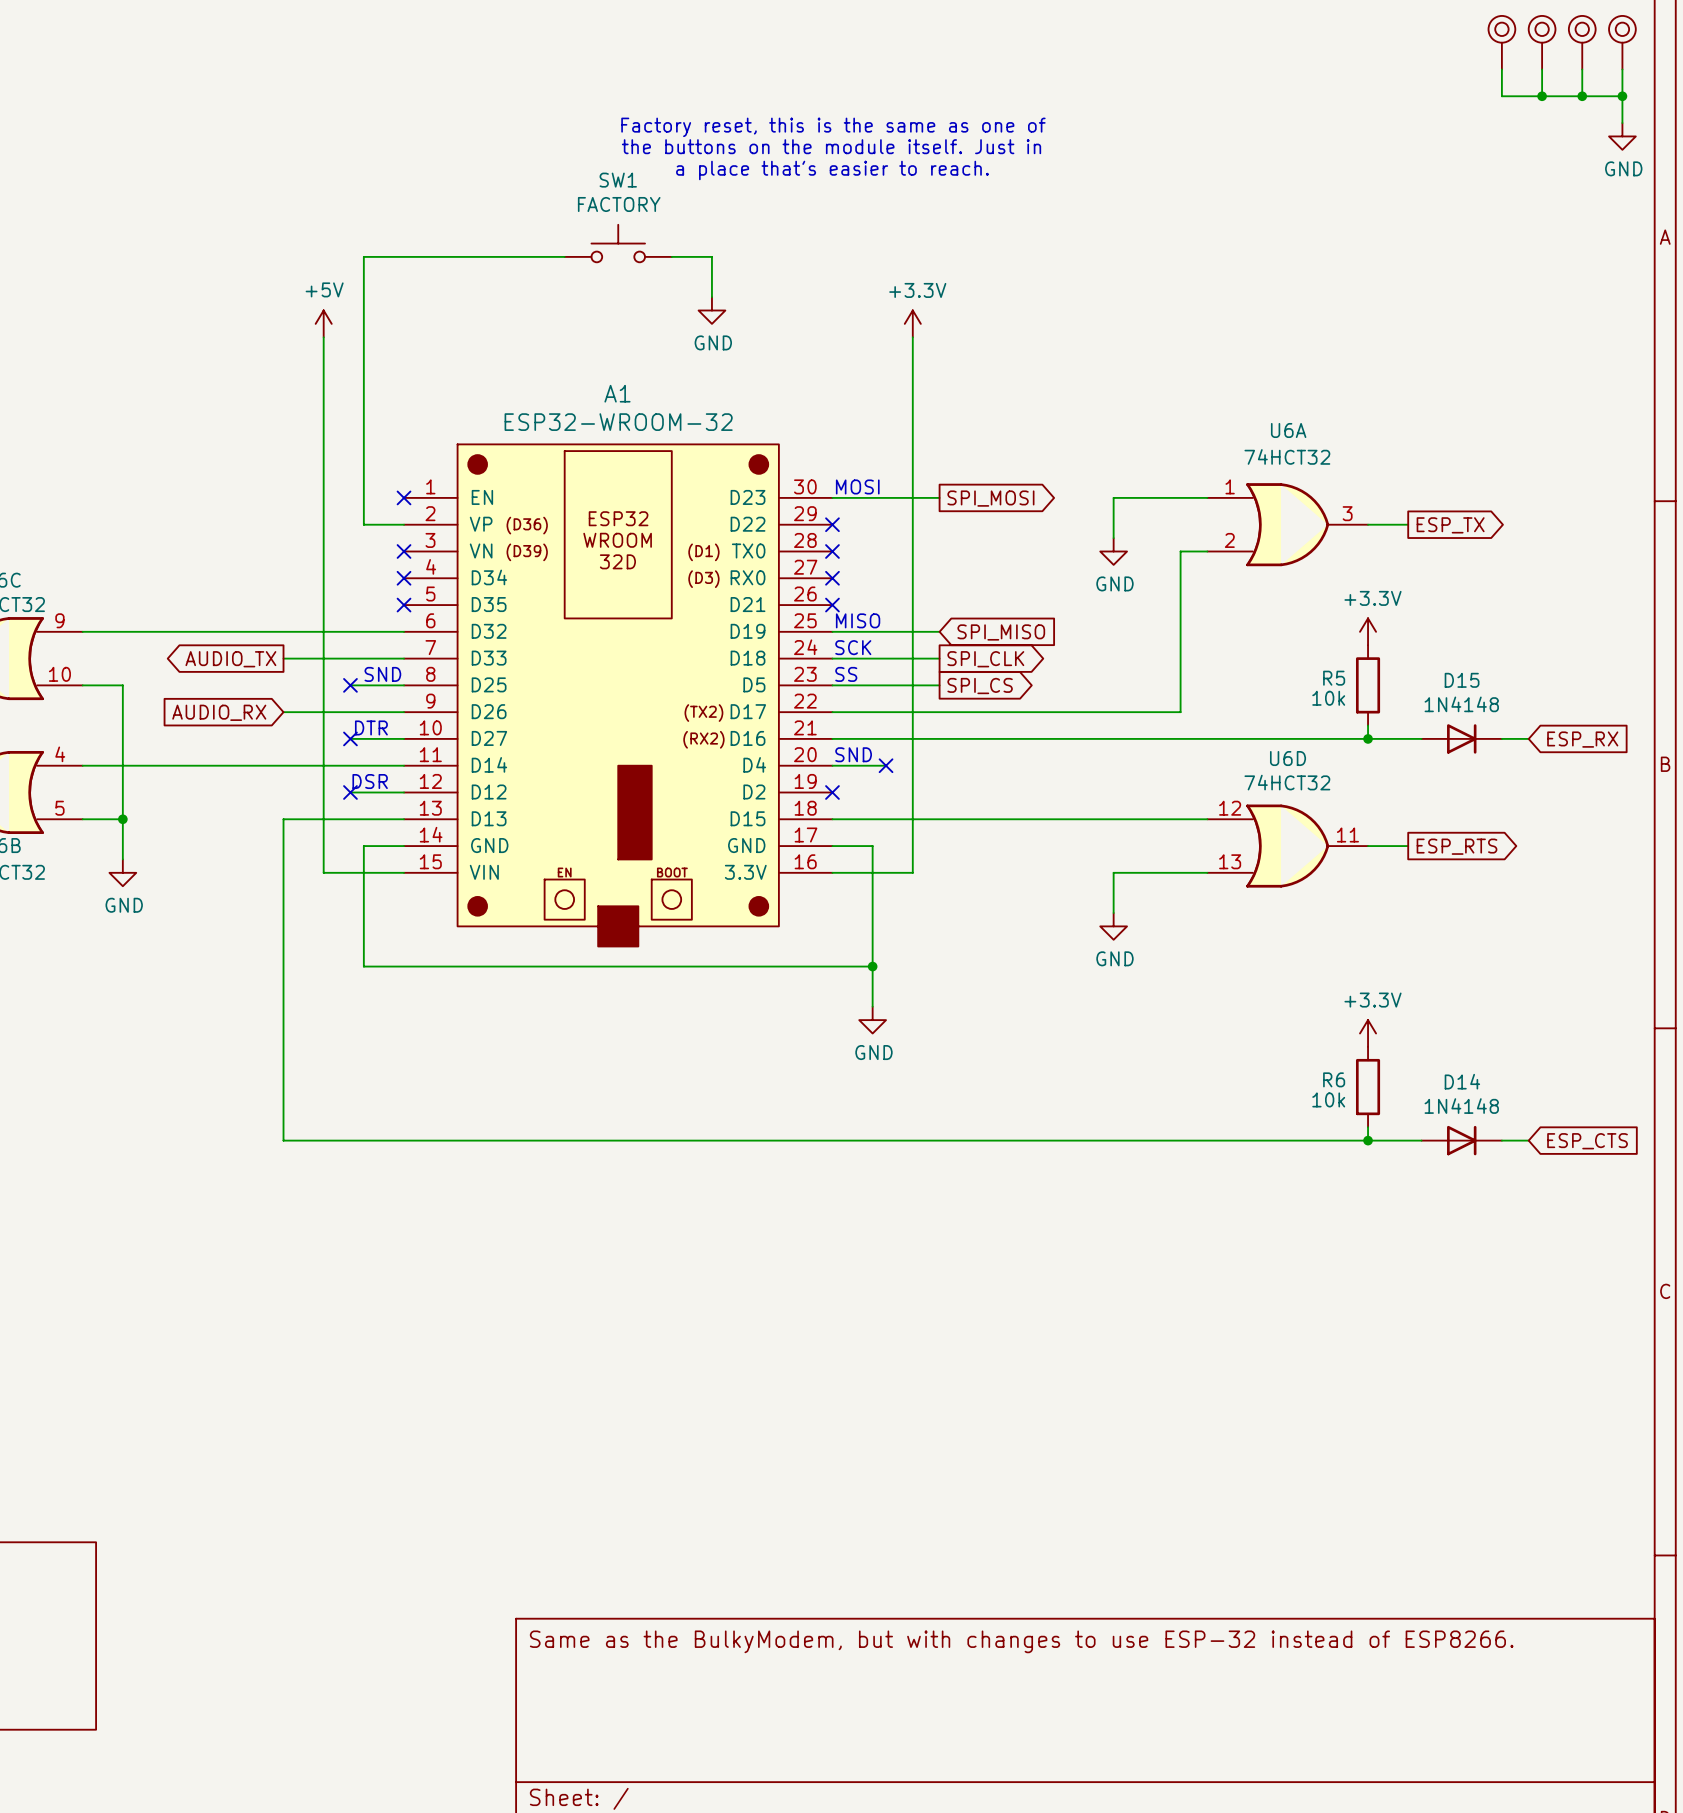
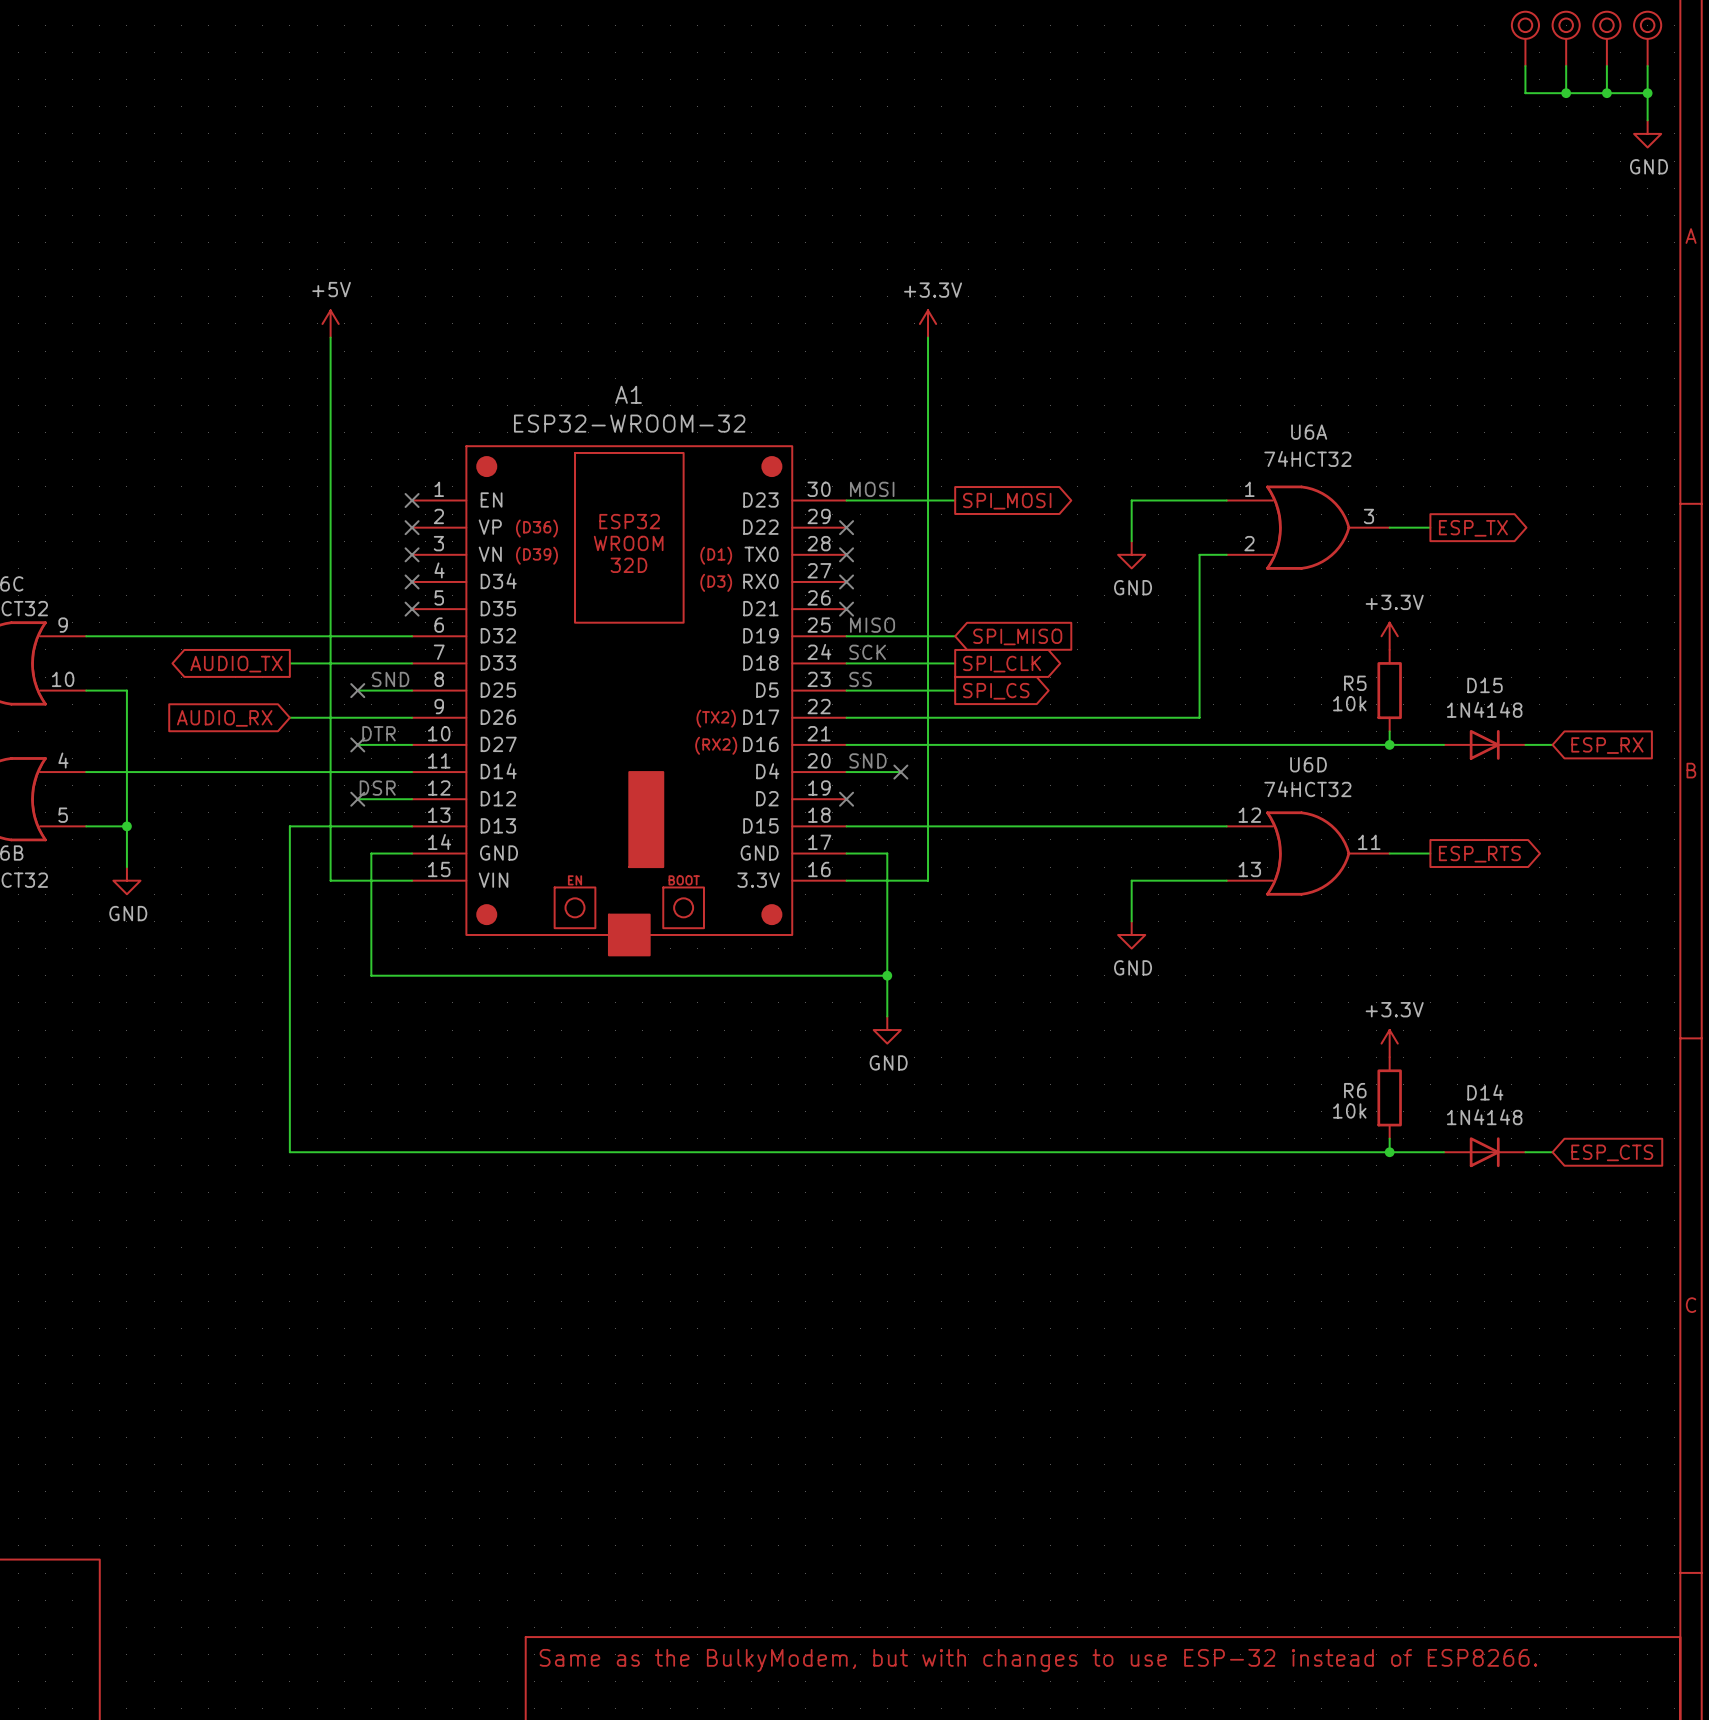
text: Factory reset, this is the same as one of (833, 127) -> none
text: the buttons on the module itself. Just in (831, 146) -> none
text: a place that's easier to reach. (832, 170) -> none
SW1: FACTORY (618, 243) -> none
wire: (564, 256) (363, 256) (363, 524) (404, 524) -> none
wire: (671, 256) (711, 256) (711, 297) -> none
power symbol: GND (711, 310) -> none
no-connect mark: none -> (412, 527)

